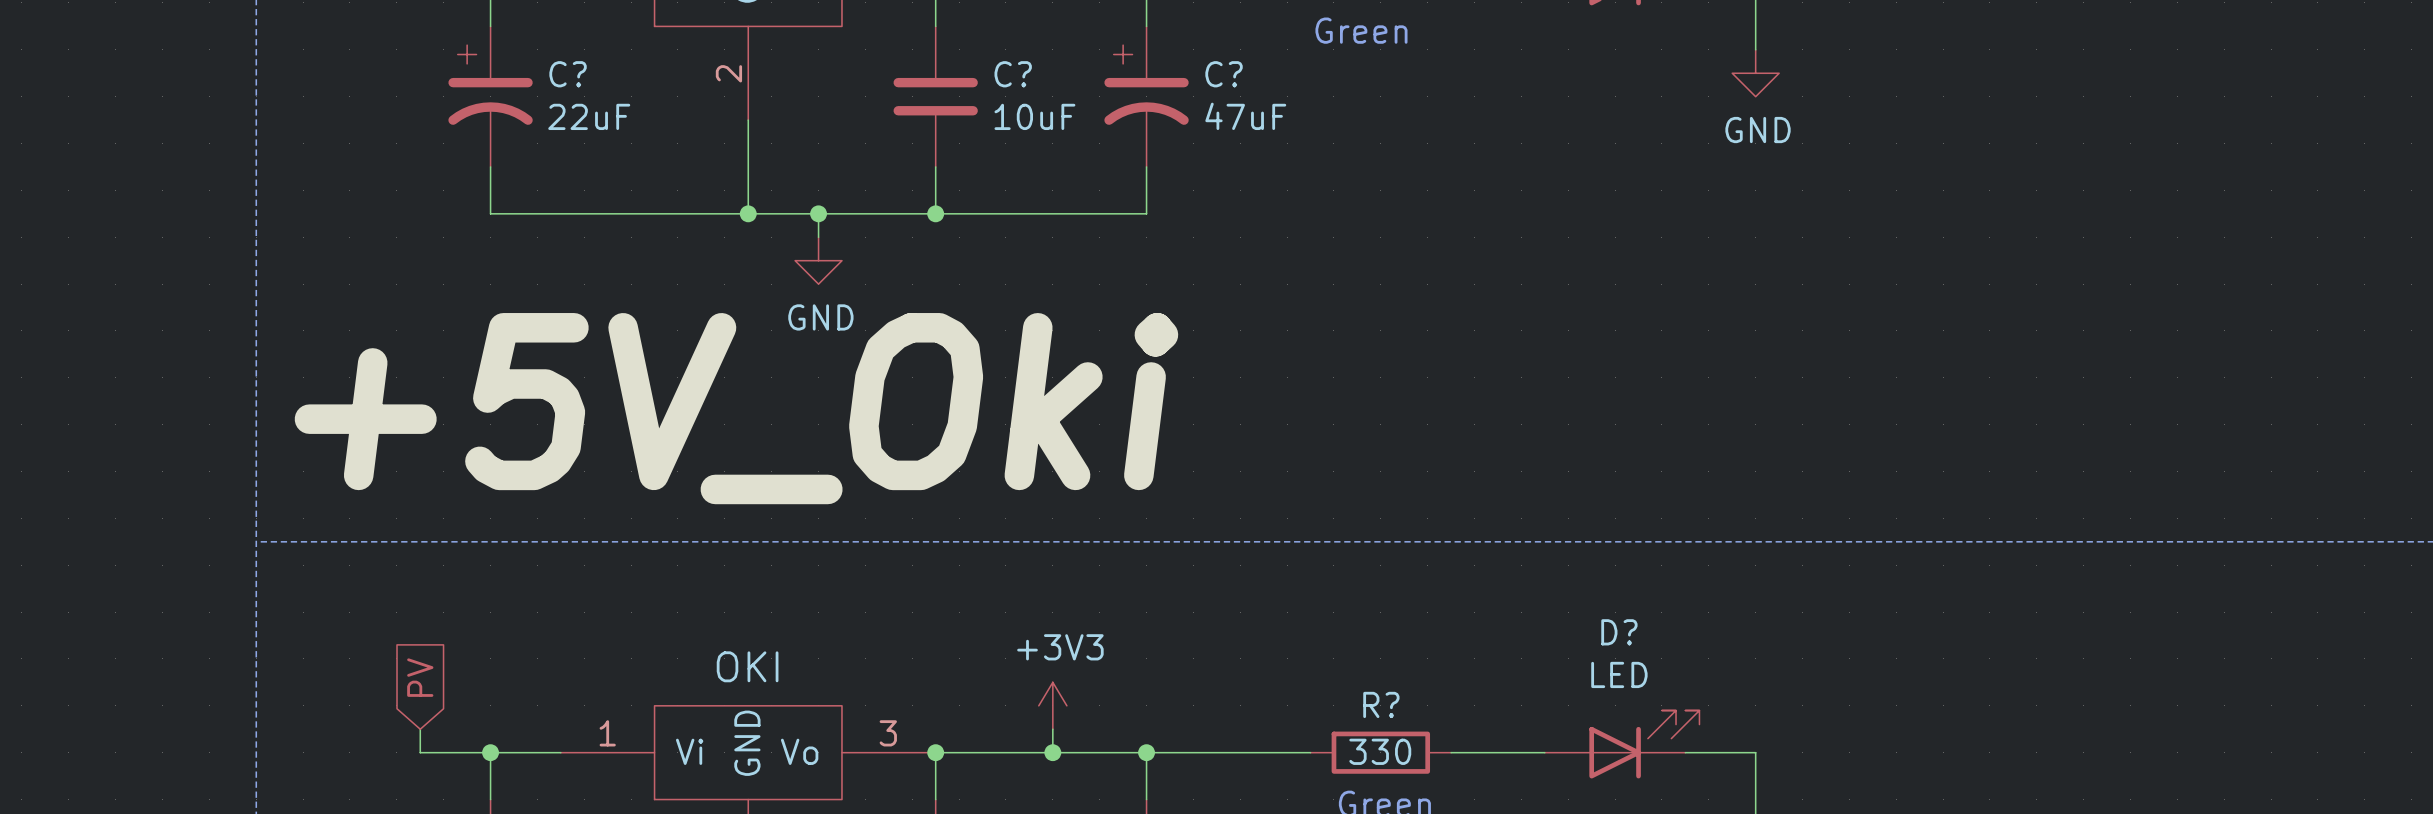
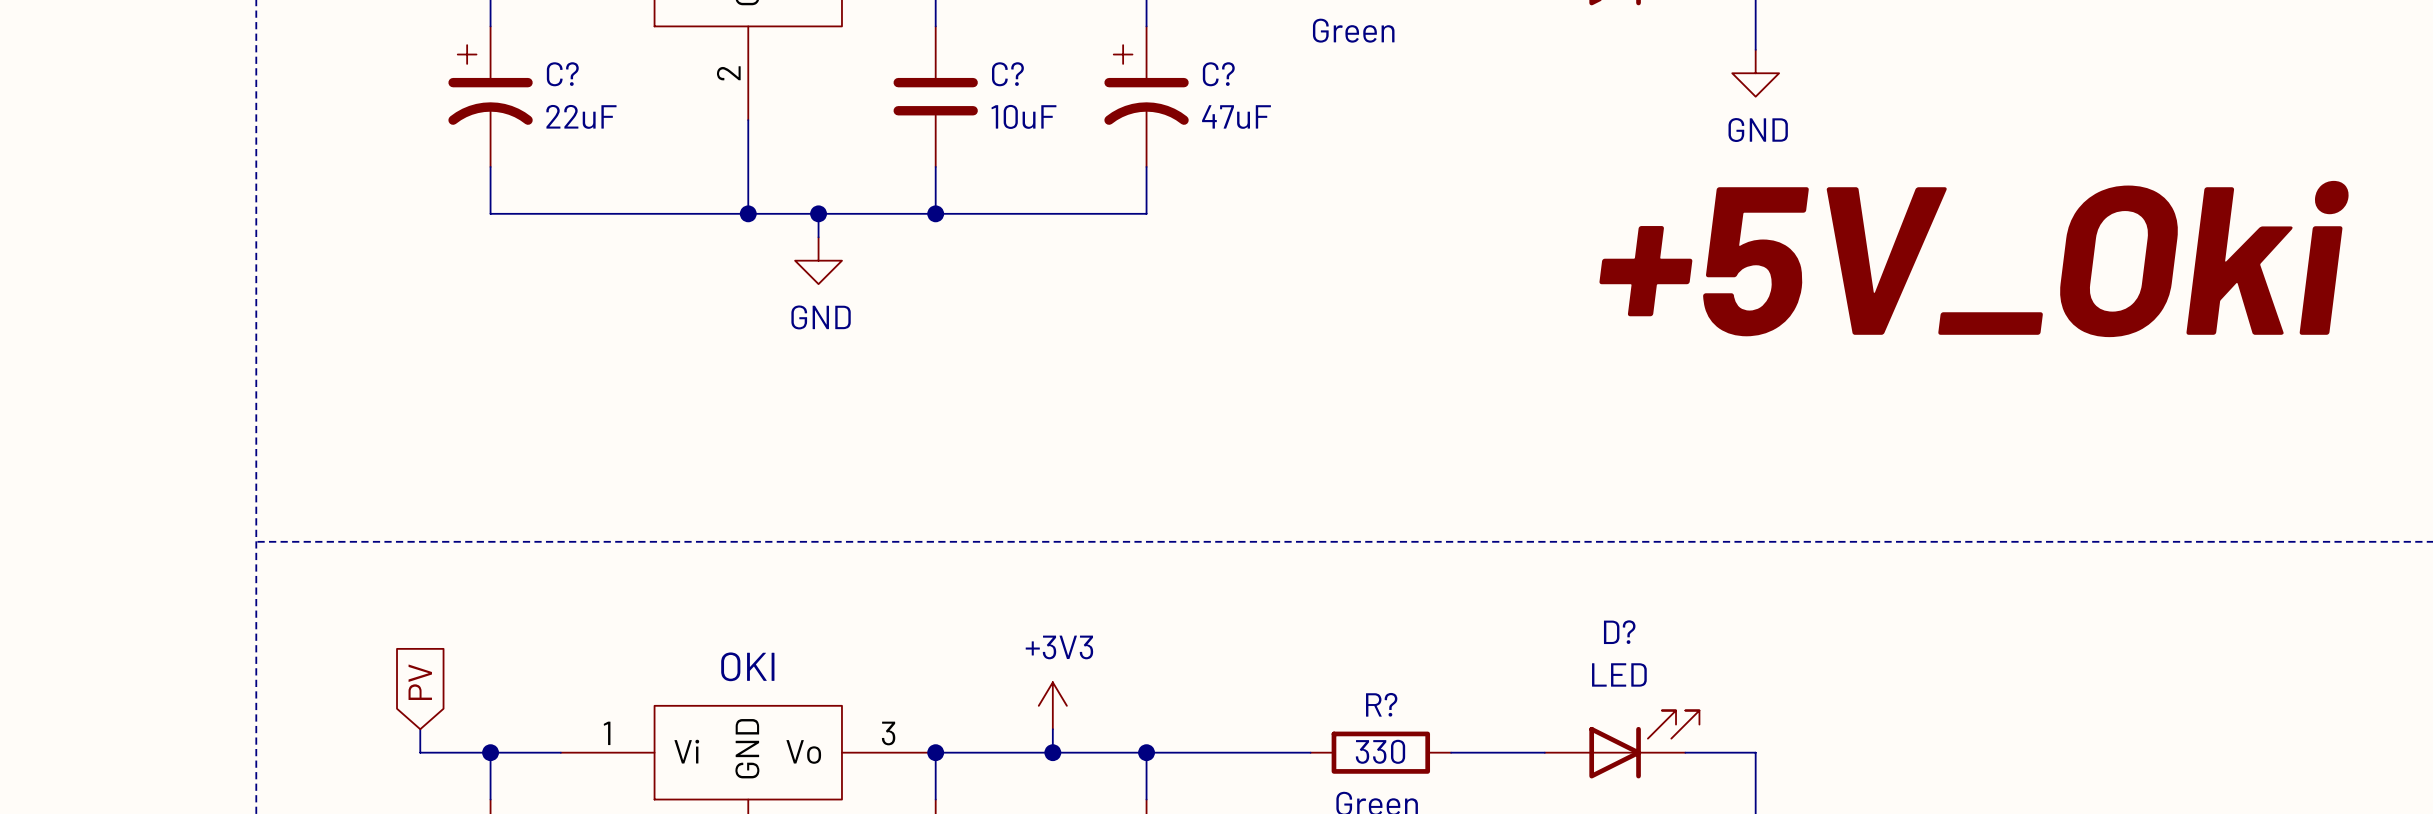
label: none -> +5V_Oki (1974, 259)
label: +5V_Oki (736, 408) -> none

